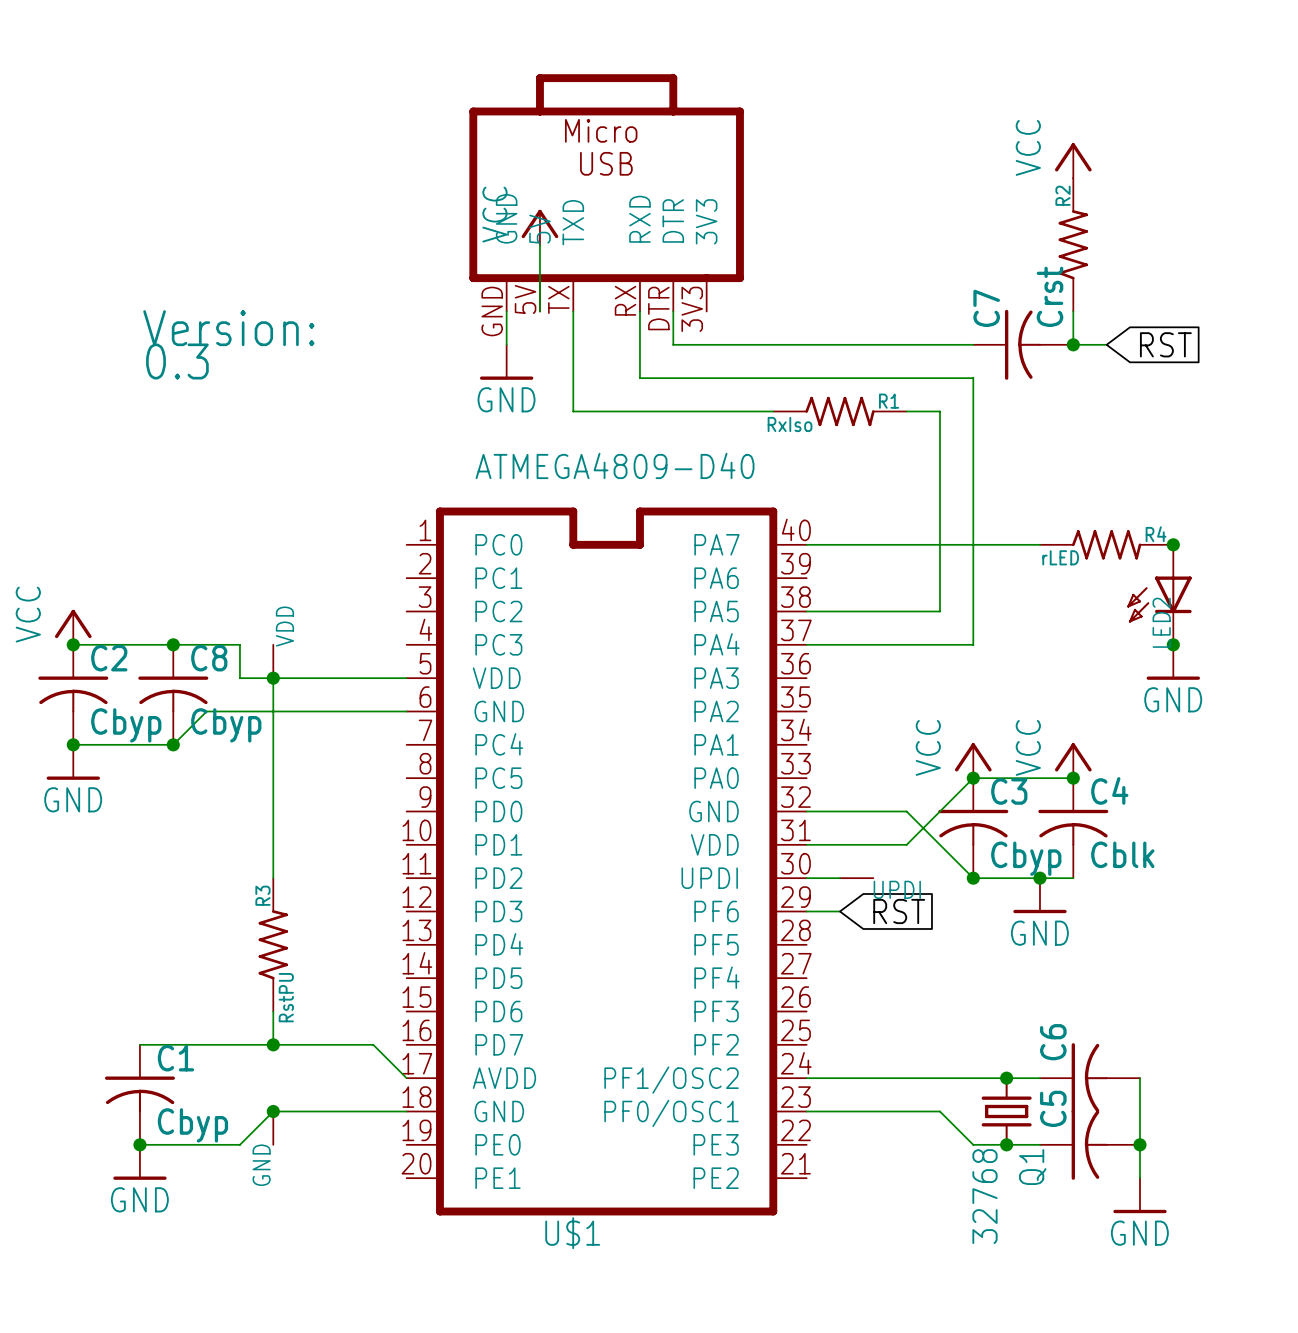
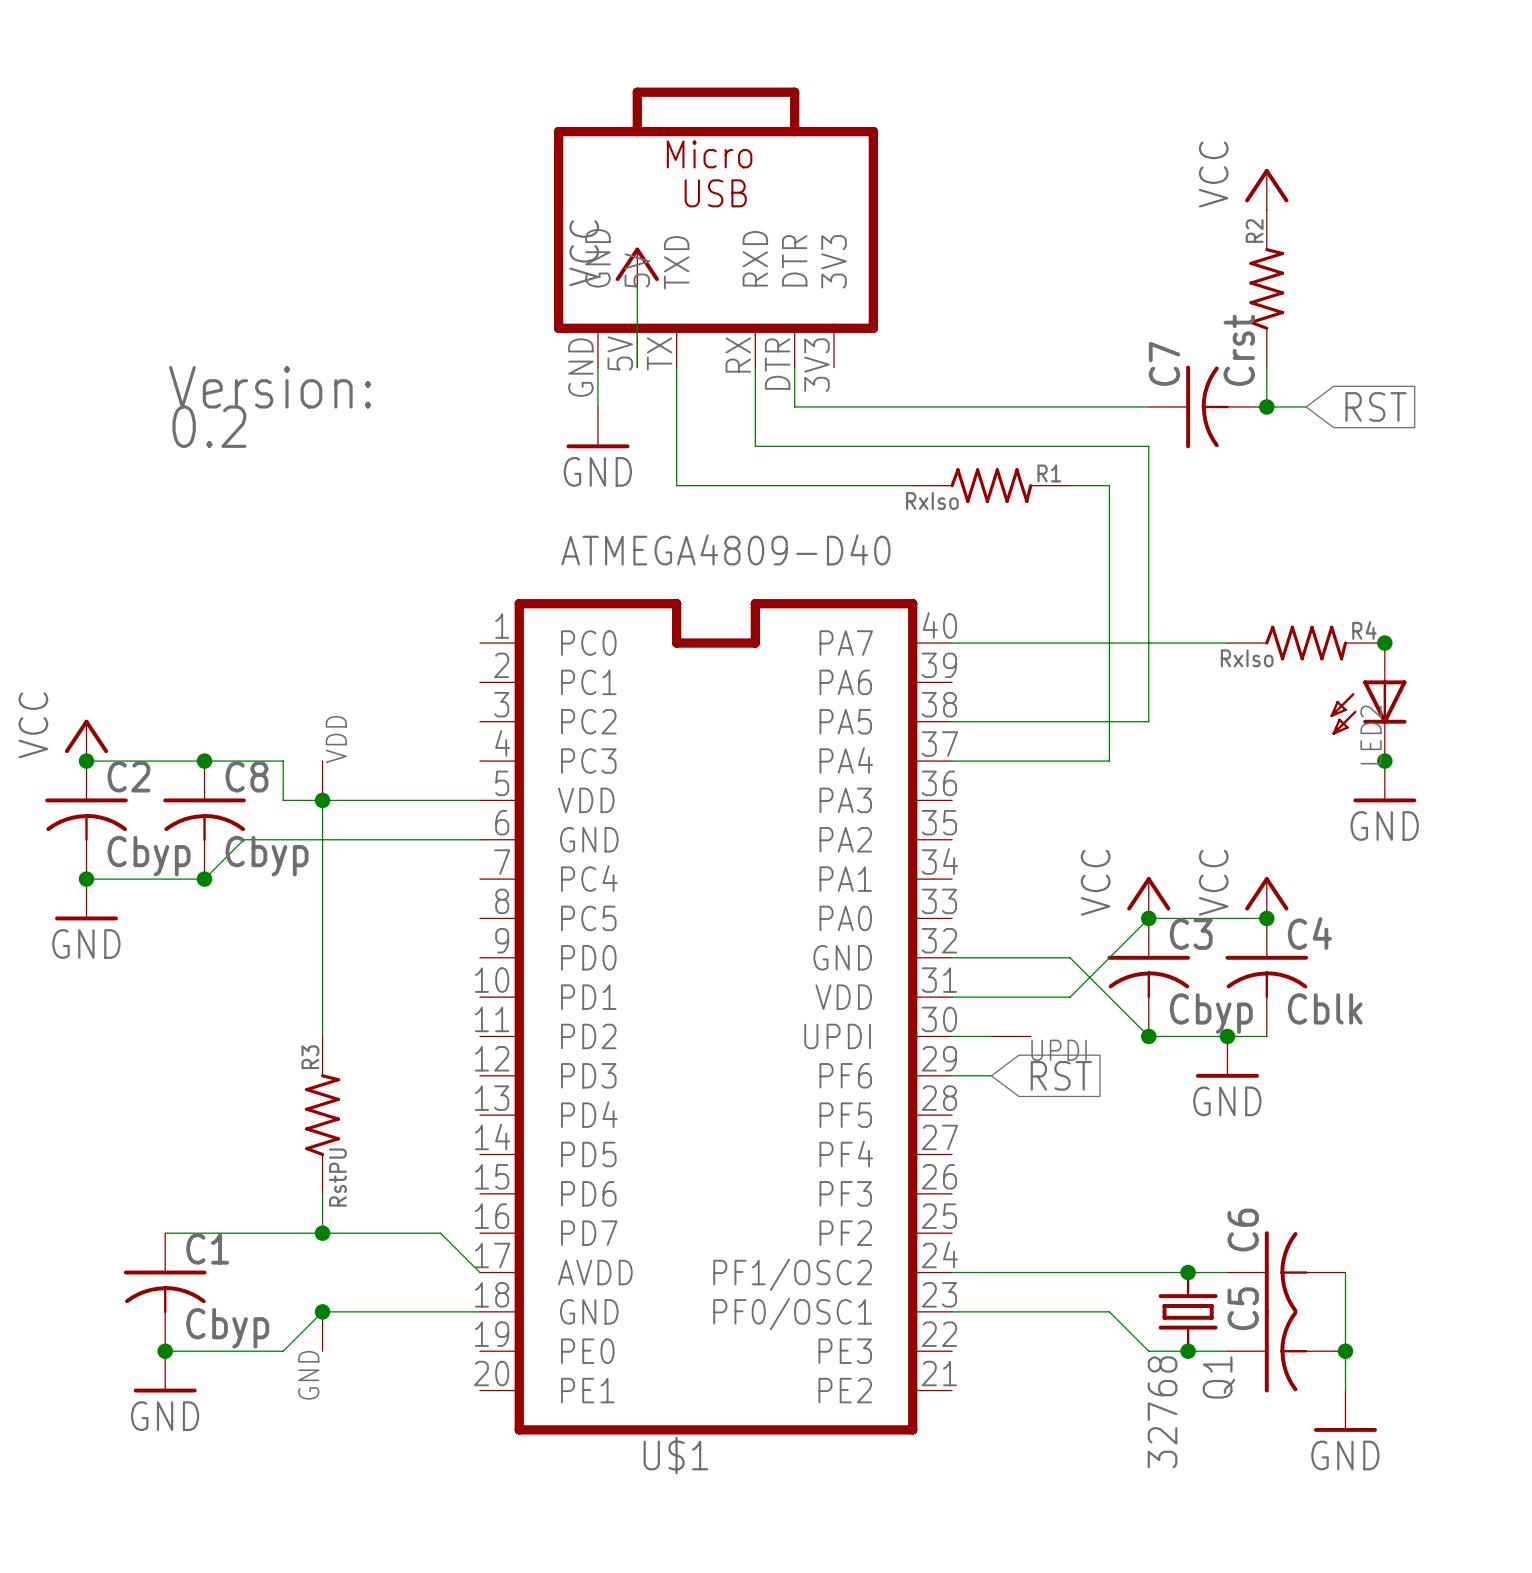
part value: 0.3 (177, 361) -> 0.2 (209, 426)
R4 value: rLED (1060, 557) -> RxIso (1247, 658)
wire: (973, 611) (973, 644) (939, 644) -> (1148, 721) (1109, 721) (1109, 761)

